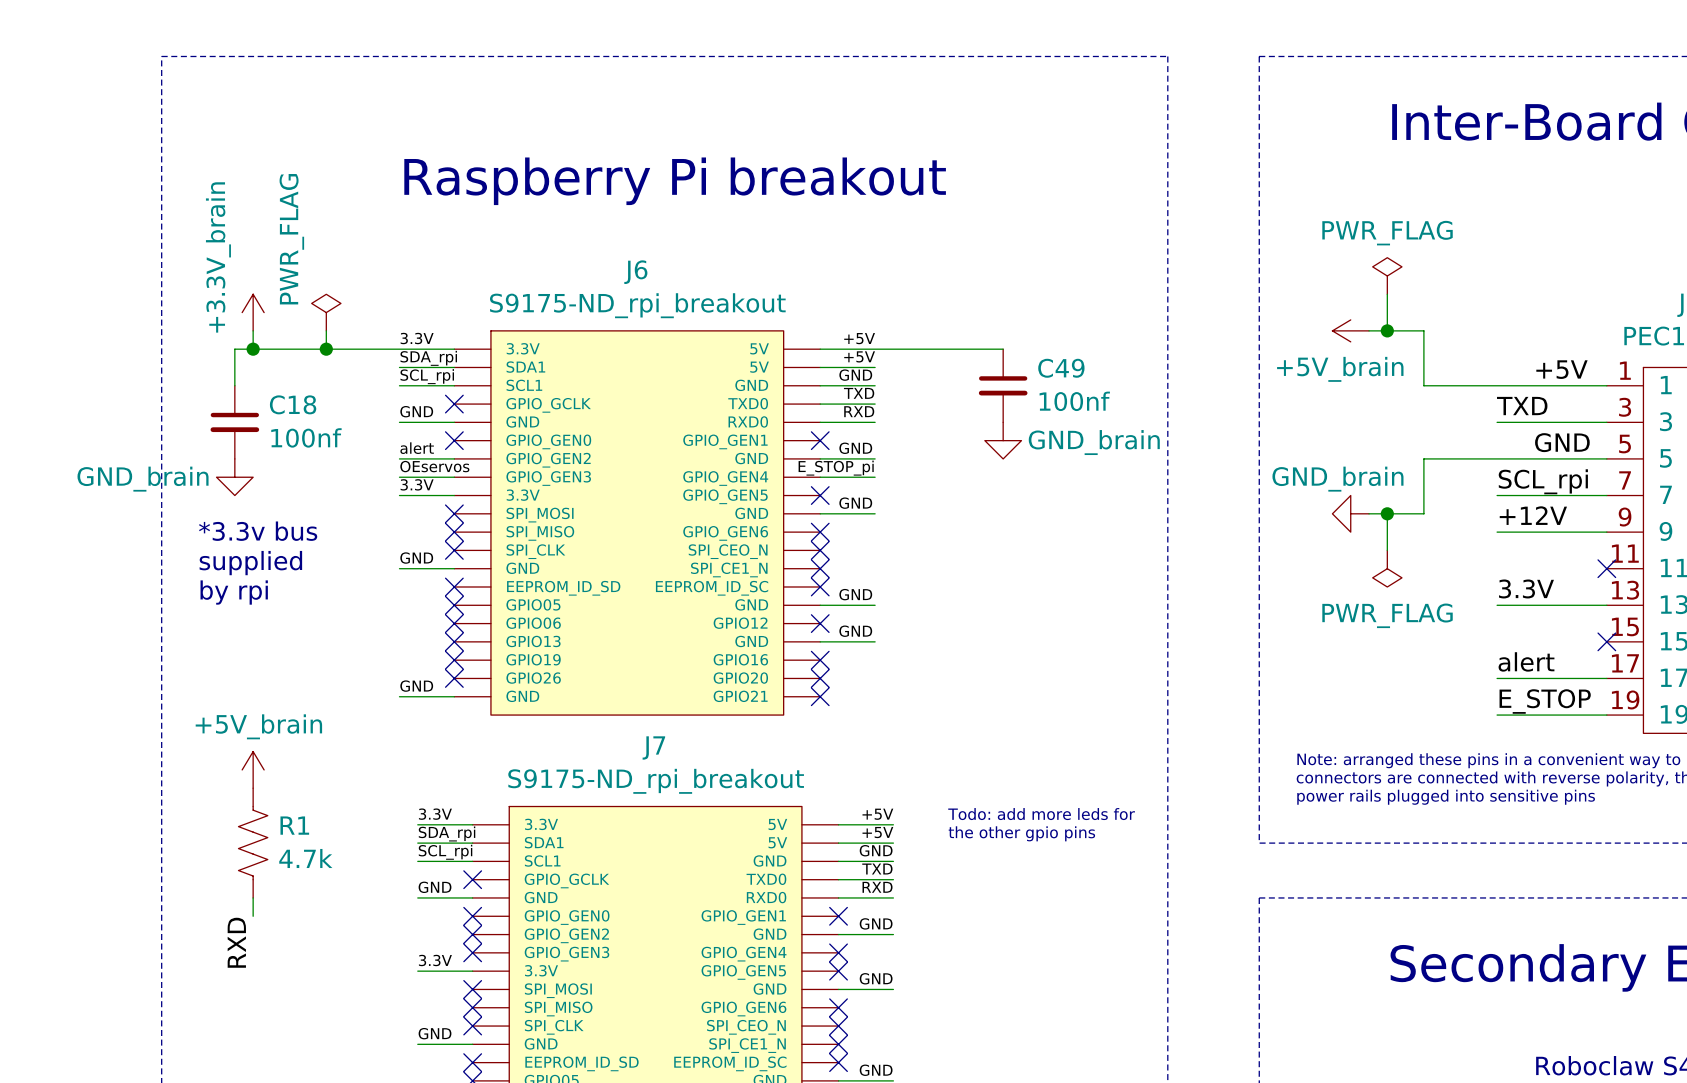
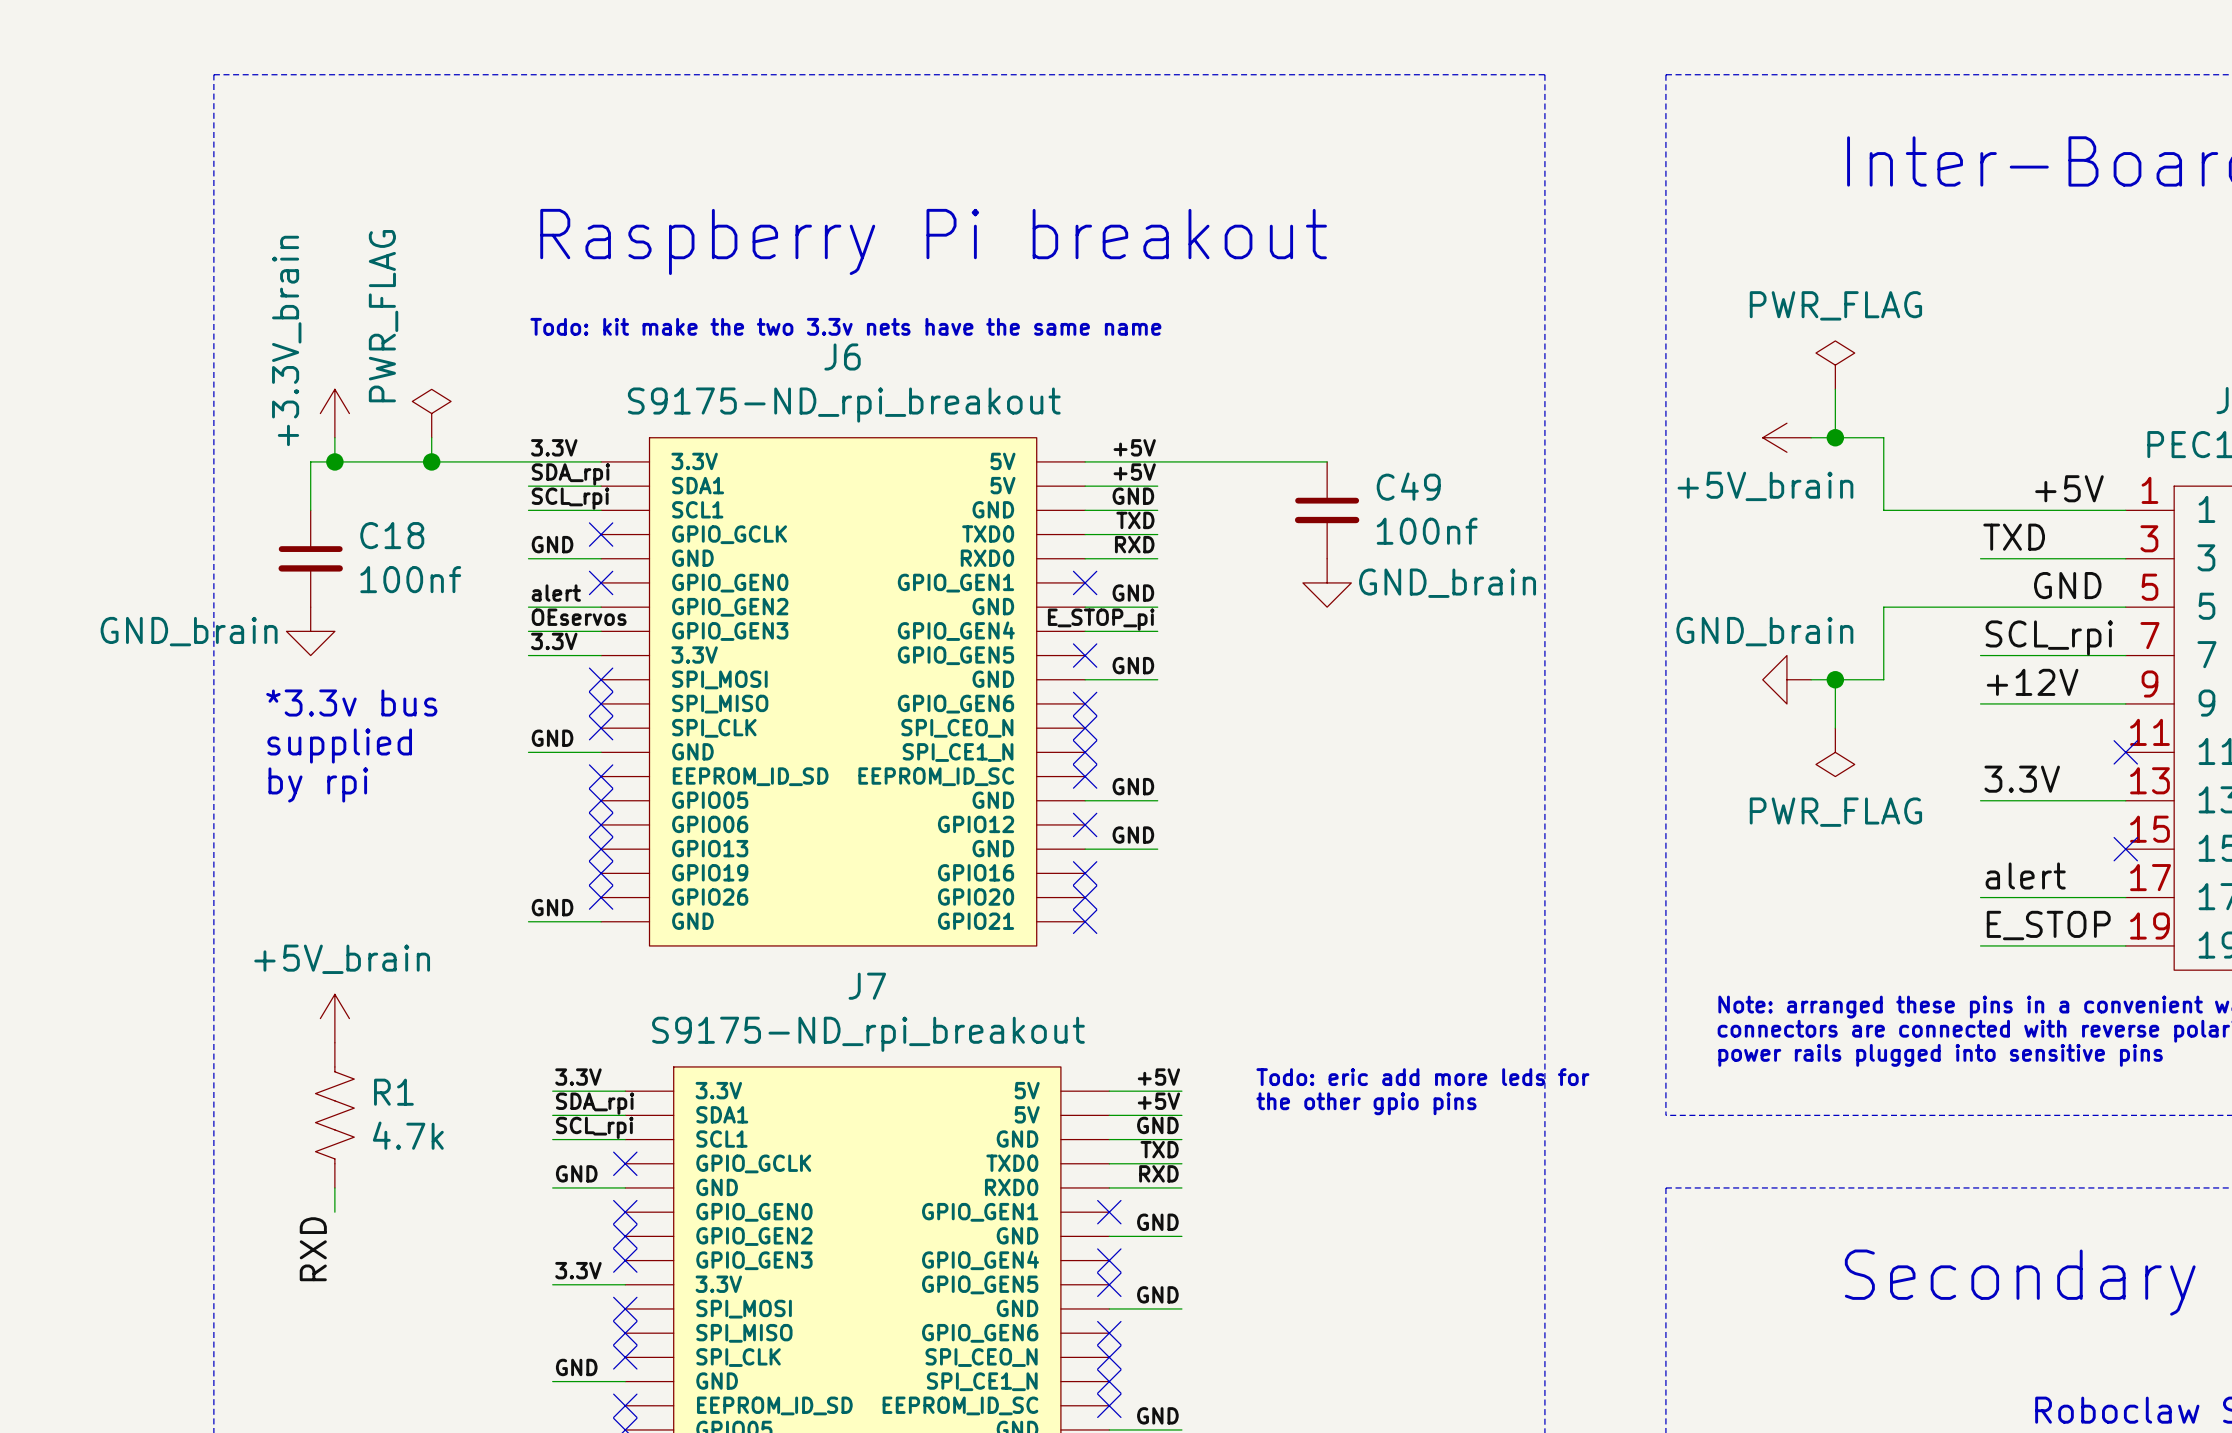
text: none -> Todo: kit make the two 3.3v nets have the same name (845, 326)
text: Todo: add more leds for (1041, 814) -> Todo: eric add more leds for (1422, 1077)

